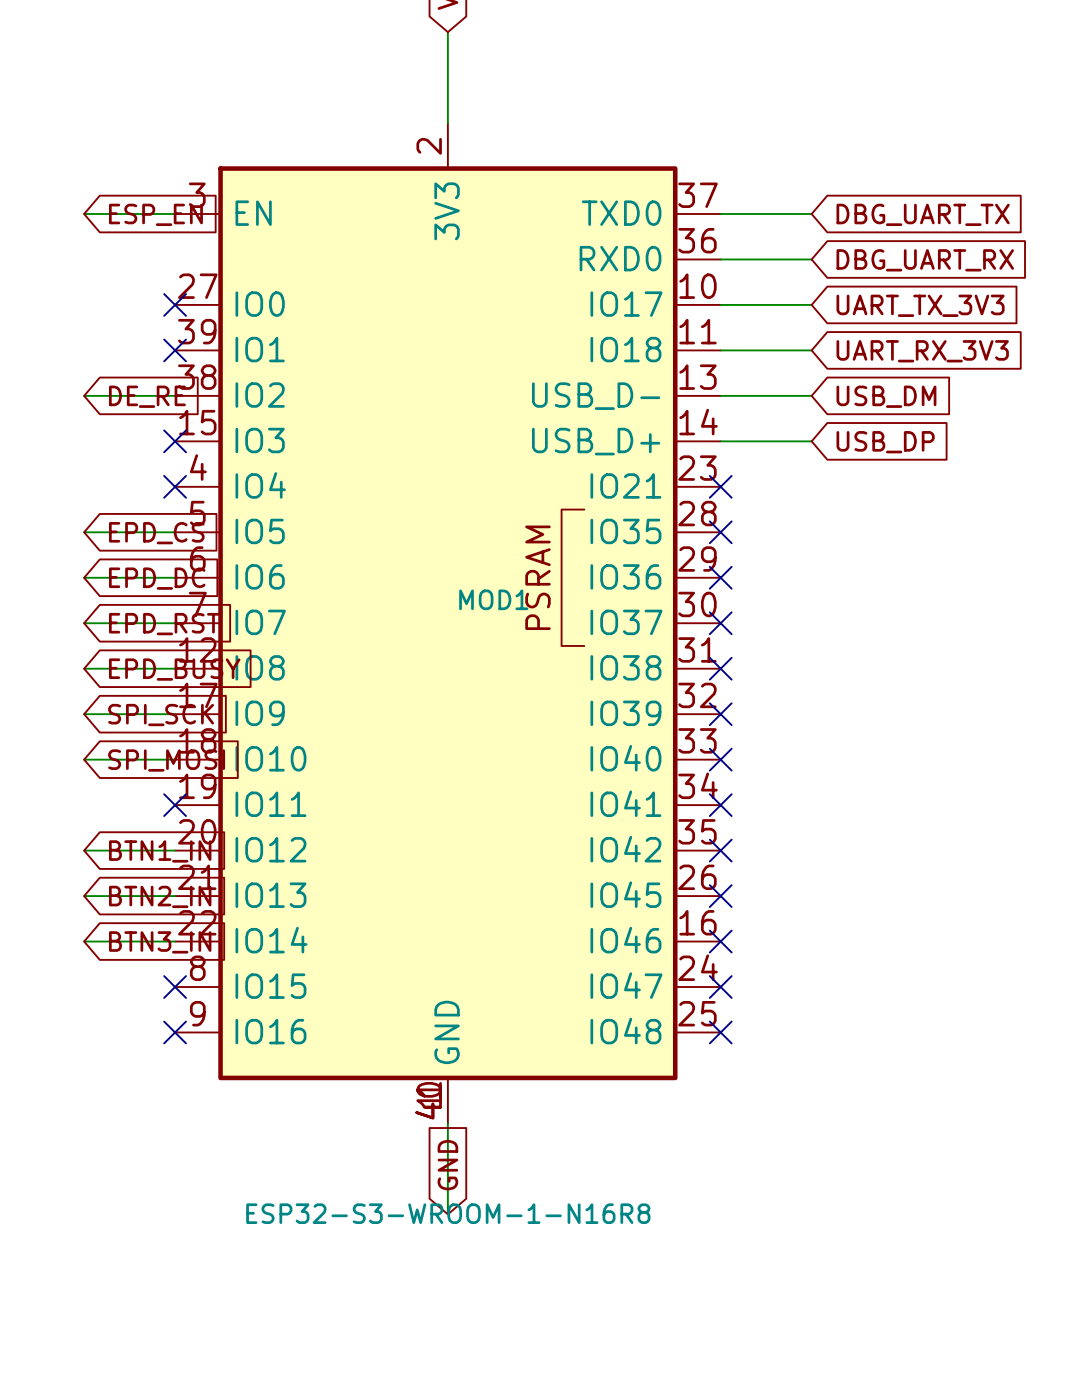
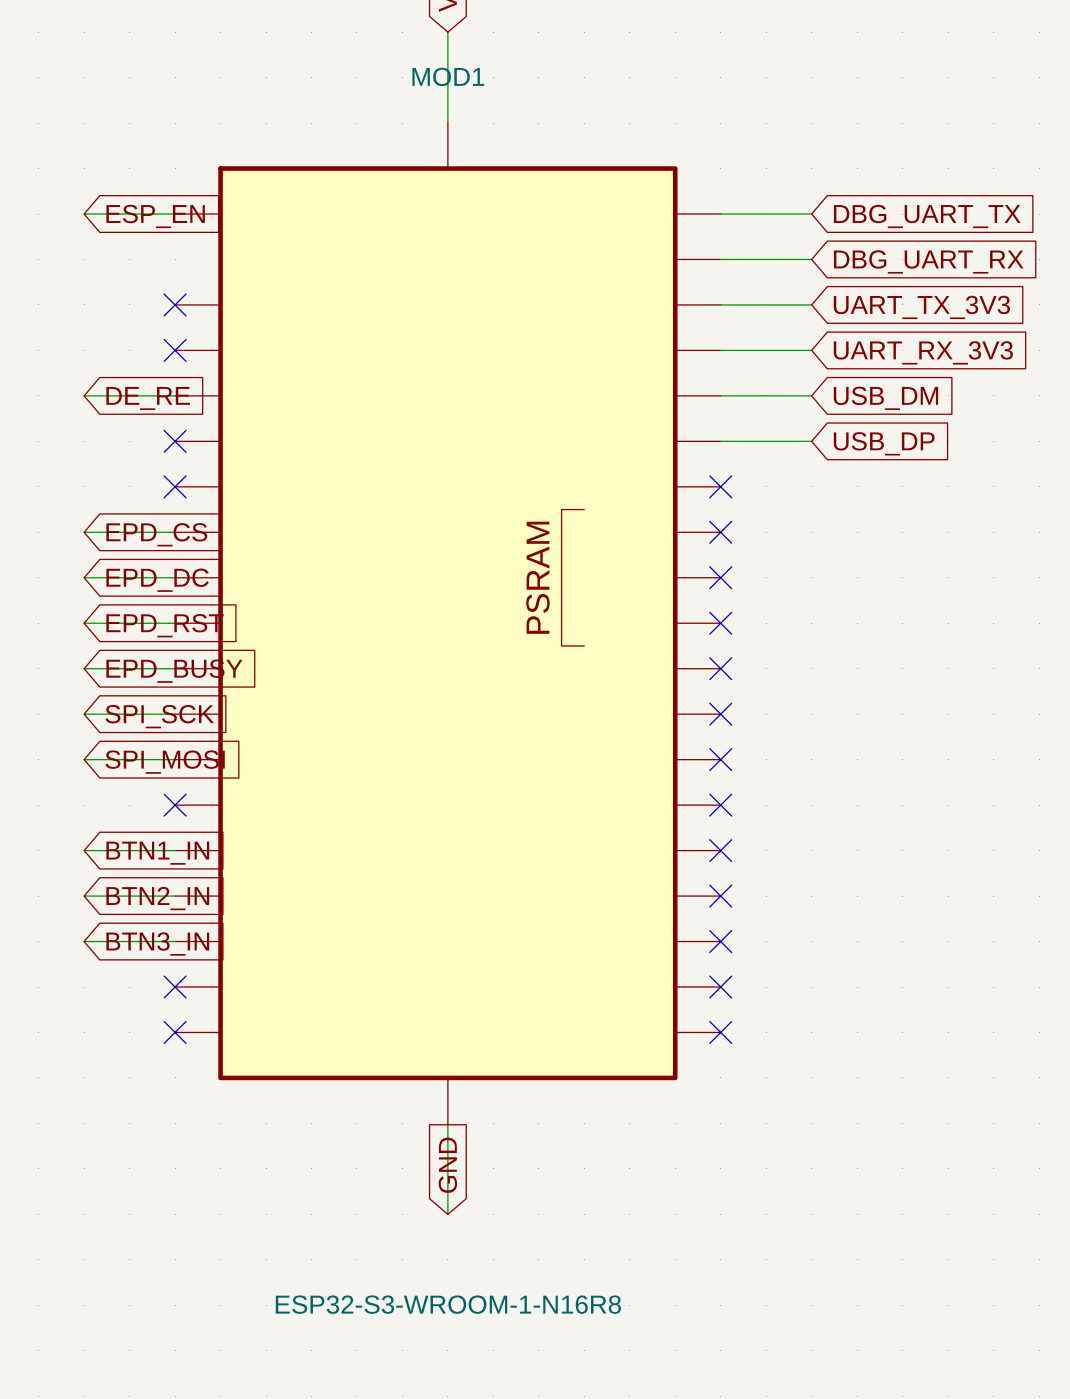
MOD1 symbol: [175, 123, 721, 1124] -> [175, 123, 721, 1124]
MOD1 name position: MOD1 (493, 599) -> MOD1 (448, 76)
MOD1 value position: ESP32-S3-WROOM-1-N16R8 (448, 1213) -> ESP32-S3-WROOM-1-N16R8 (448, 1304)

